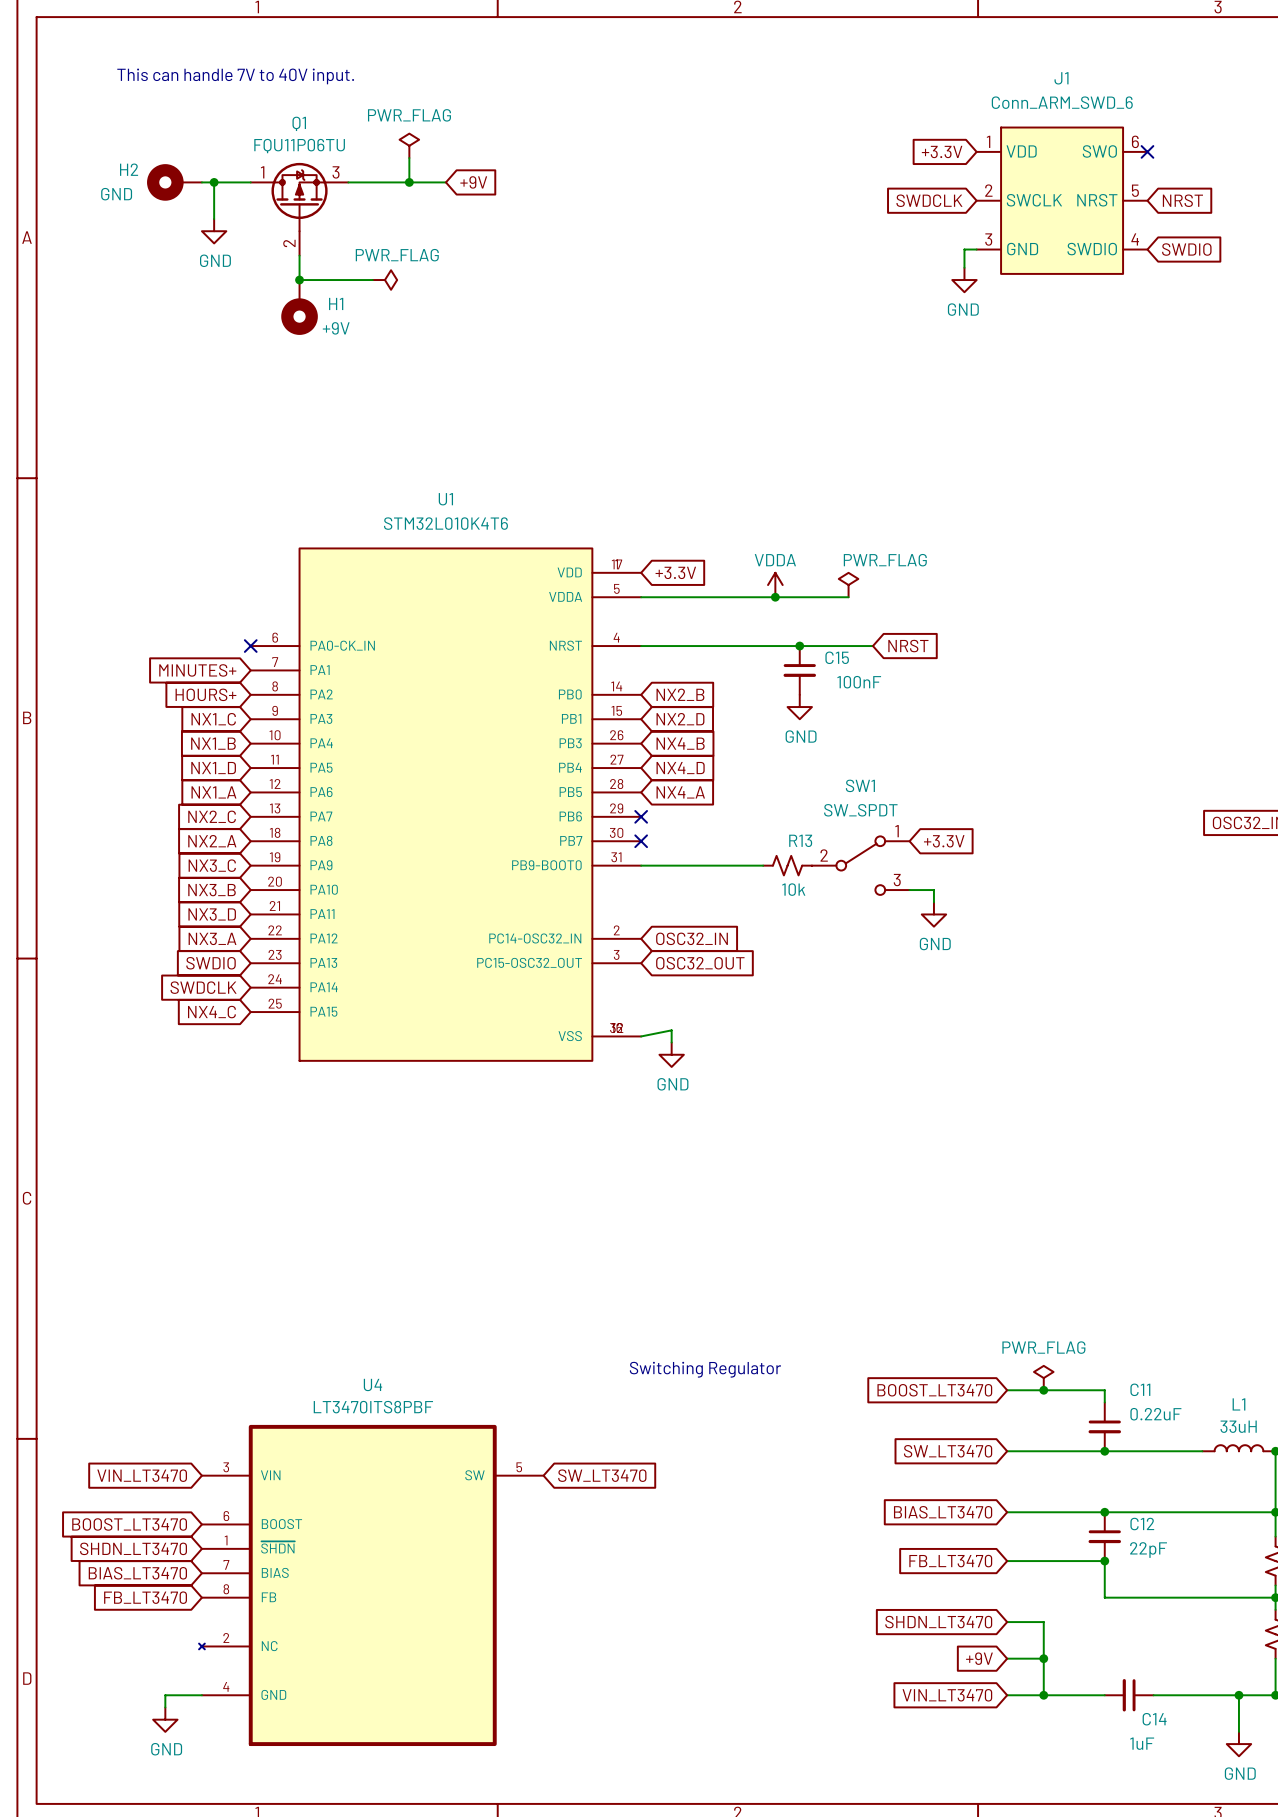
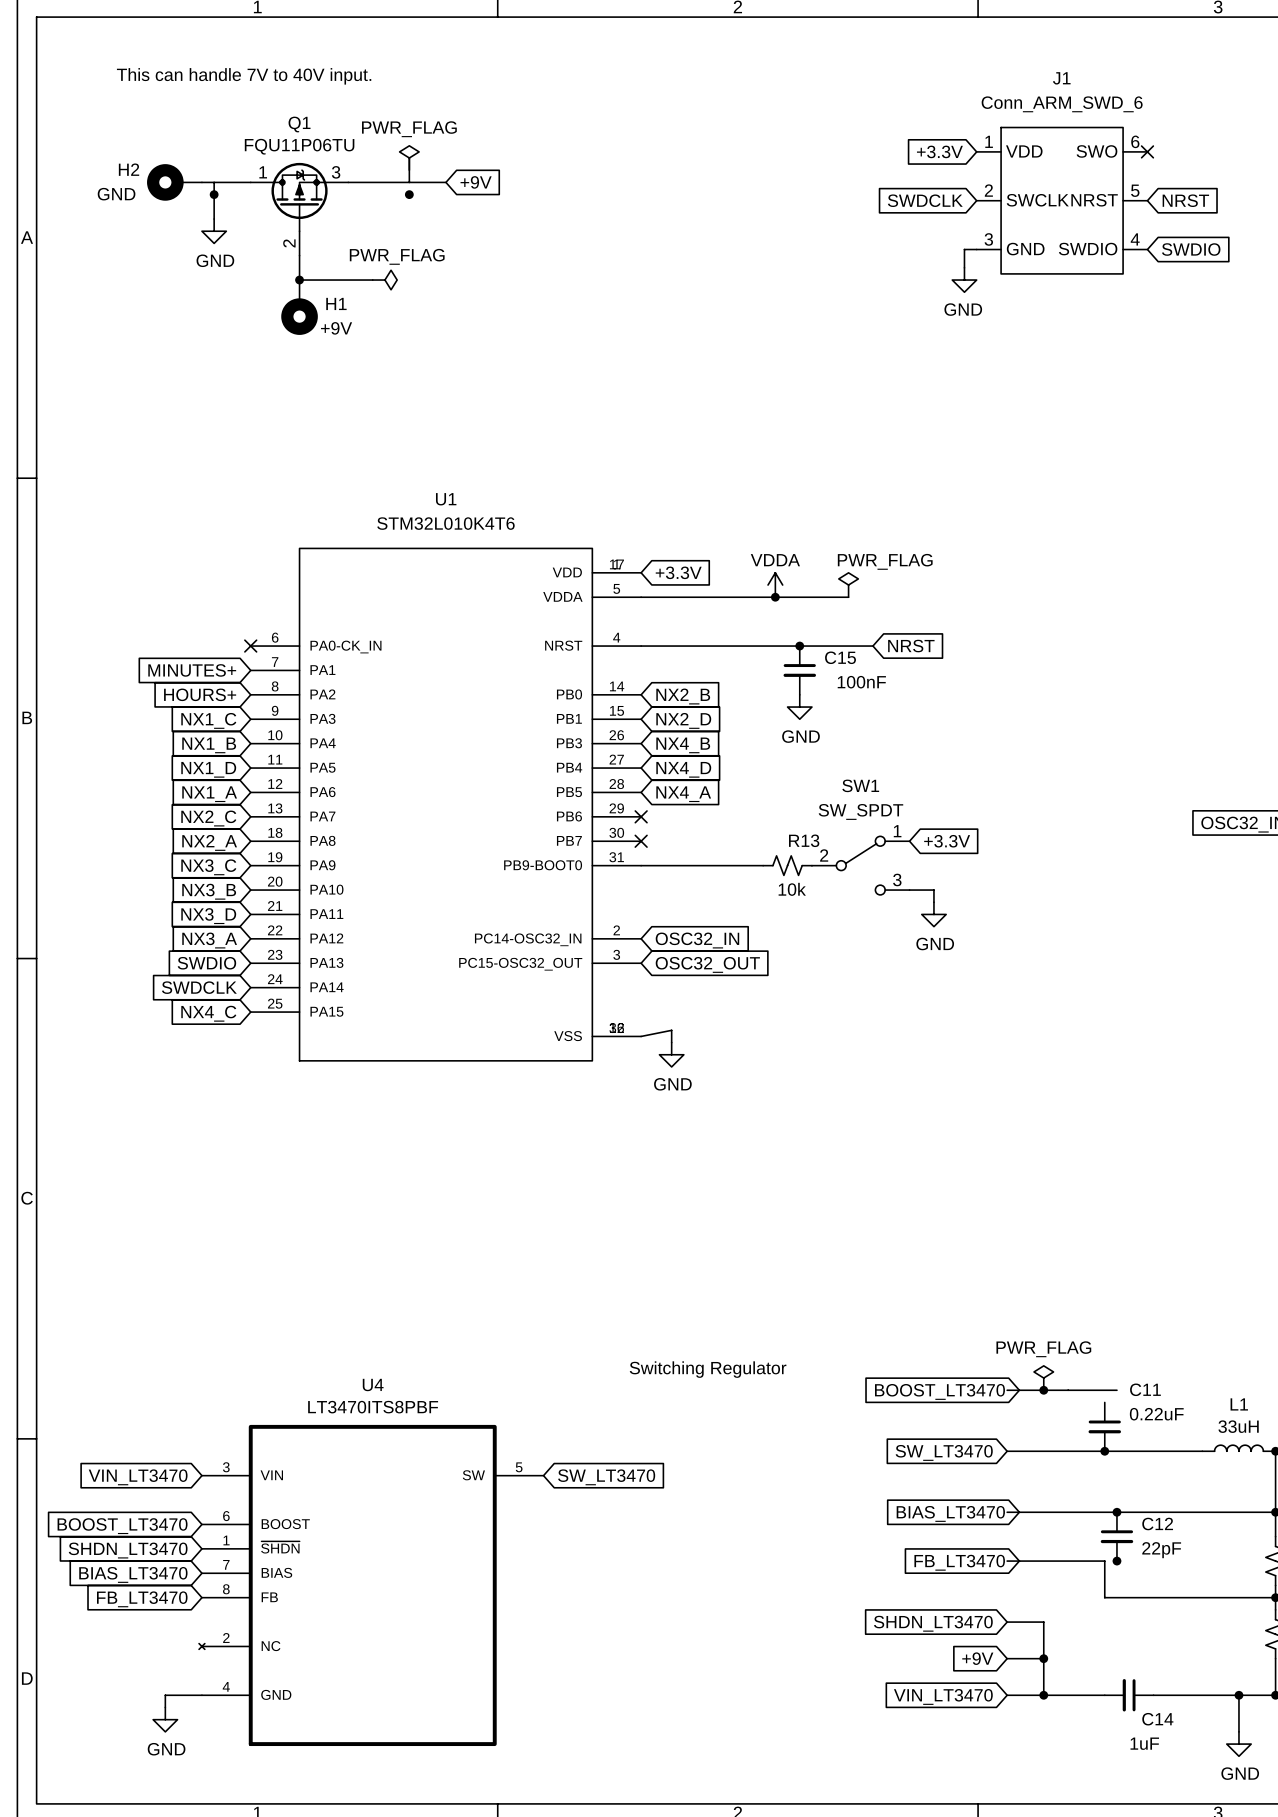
power symbol position: PWR_FLAG (409, 145) -> PWR_FLAG (409, 158)
junction position: (214, 182) -> (214, 194)
junction position: (409, 182) -> (409, 194)
global label position: BOOST_LT3470 (934, 1390) -> BOOST_LT3470 (939, 1391)
wire: (1104, 1390) (1104, 1402) -> (1104, 1390) (1116, 1390)
global label position: BIAS_LT3470 (943, 1512) -> BIAS_LT3470 (950, 1513)
junction position: (1104, 1512) -> (1116, 1512)
C12 position: (1104, 1536) -> (1116, 1536)
global label position: FB_LT3470 (950, 1561) -> FB_LT3470 (959, 1562)
junction position: (1104, 1561) -> (1116, 1561)

